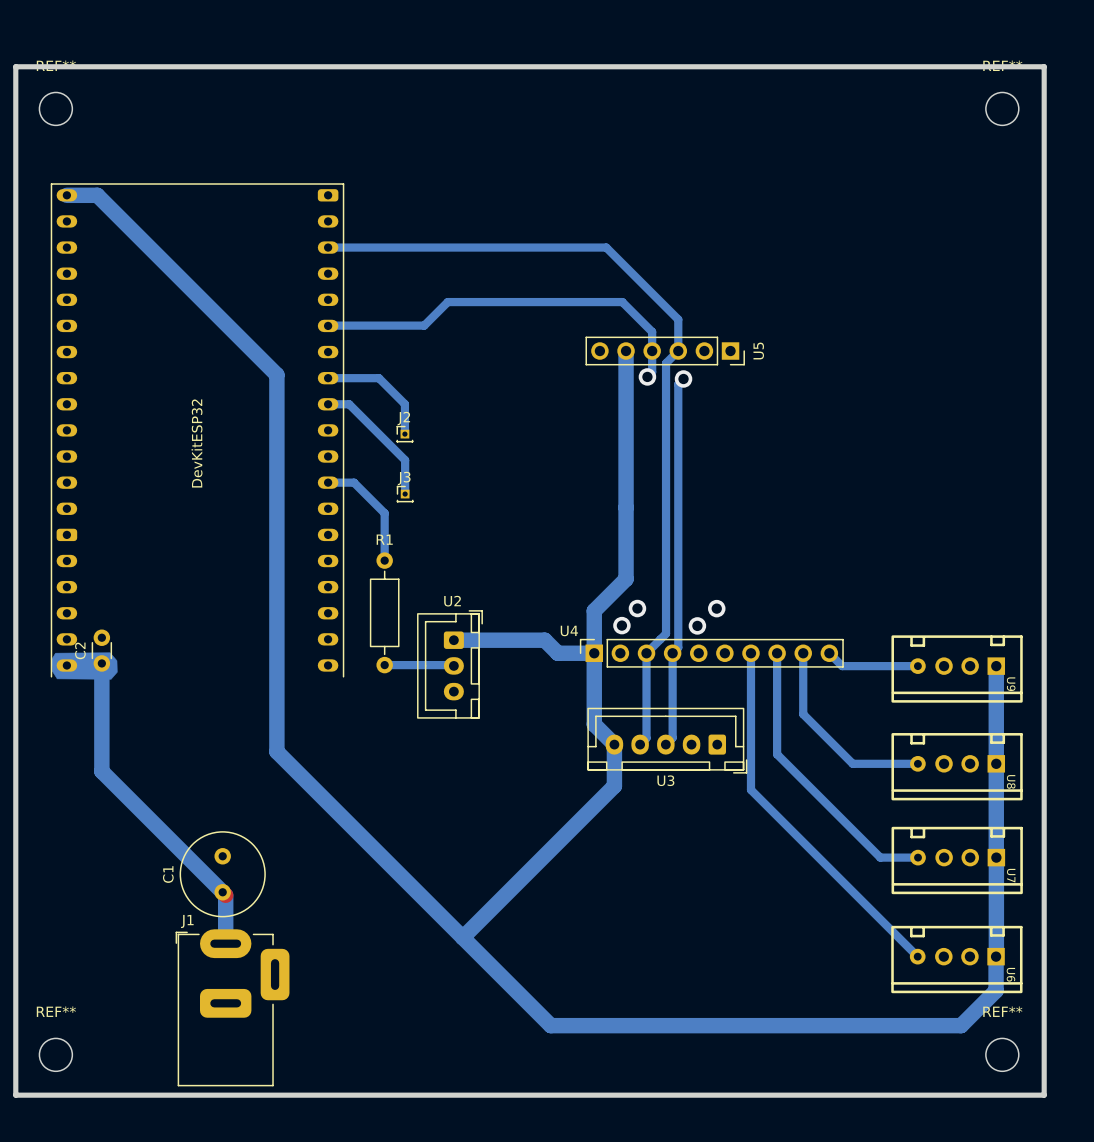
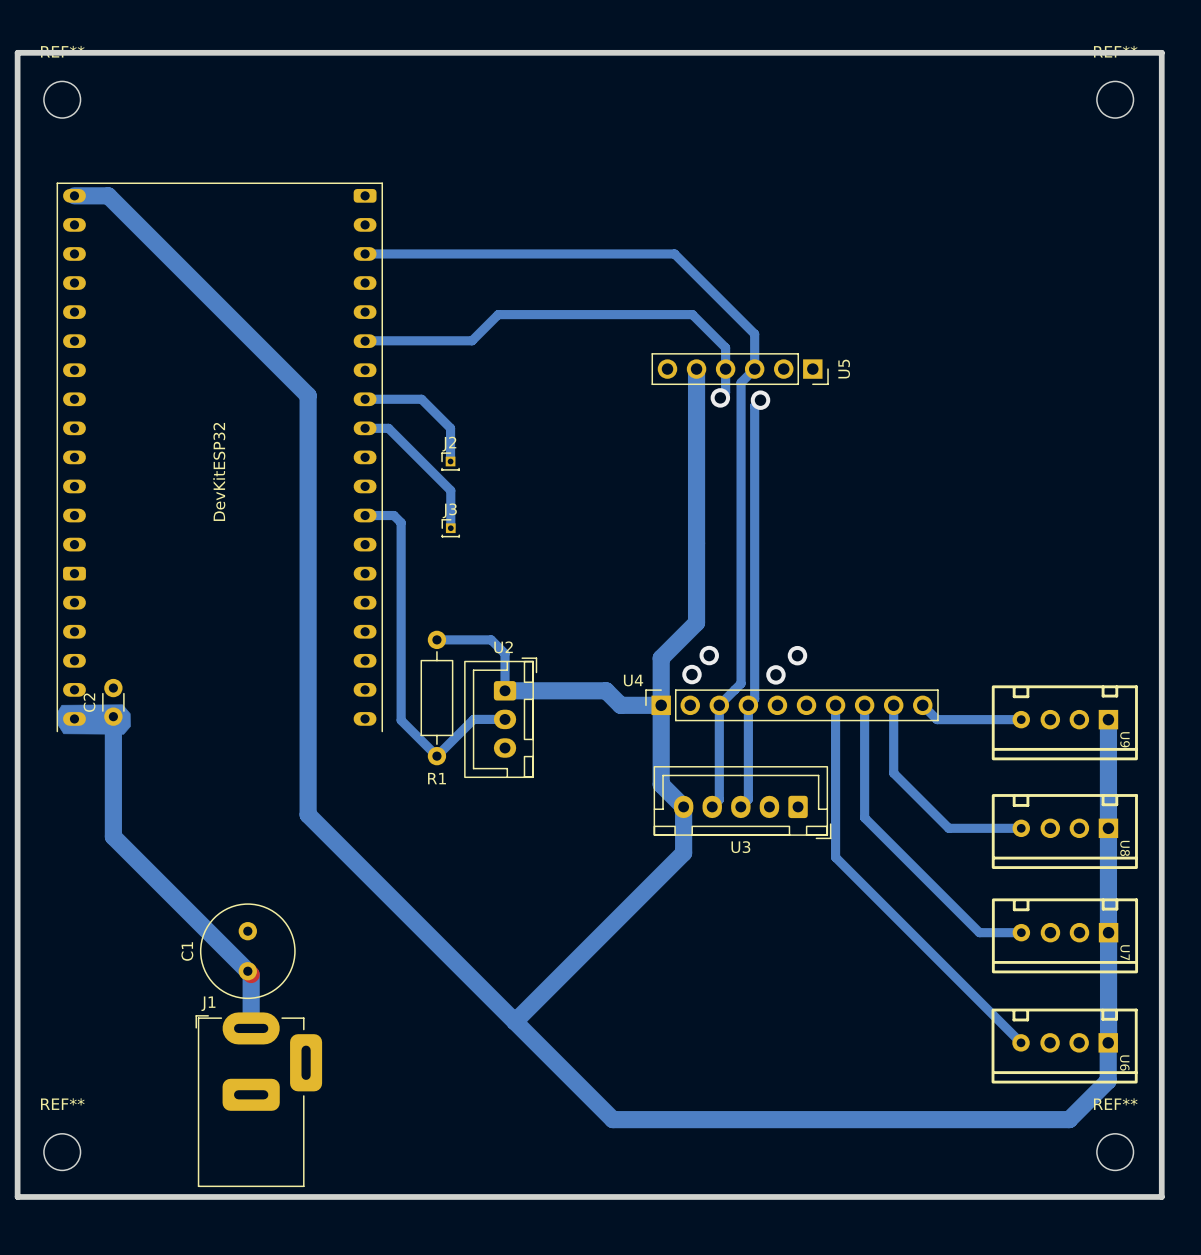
bottom track: (360, 489) (384, 513) (384, 560) -> (401, 522) (401, 720) (436, 756) (473, 719) (505, 719)
R1 name position: R1 (384, 539) -> R1 (436, 778)
bottom track: none -> (436, 639) (491, 639) (505, 653) (505, 690)
R1 position: (384, 612) -> (436, 698)
bottom track: (384, 665) (453, 665) -> none

